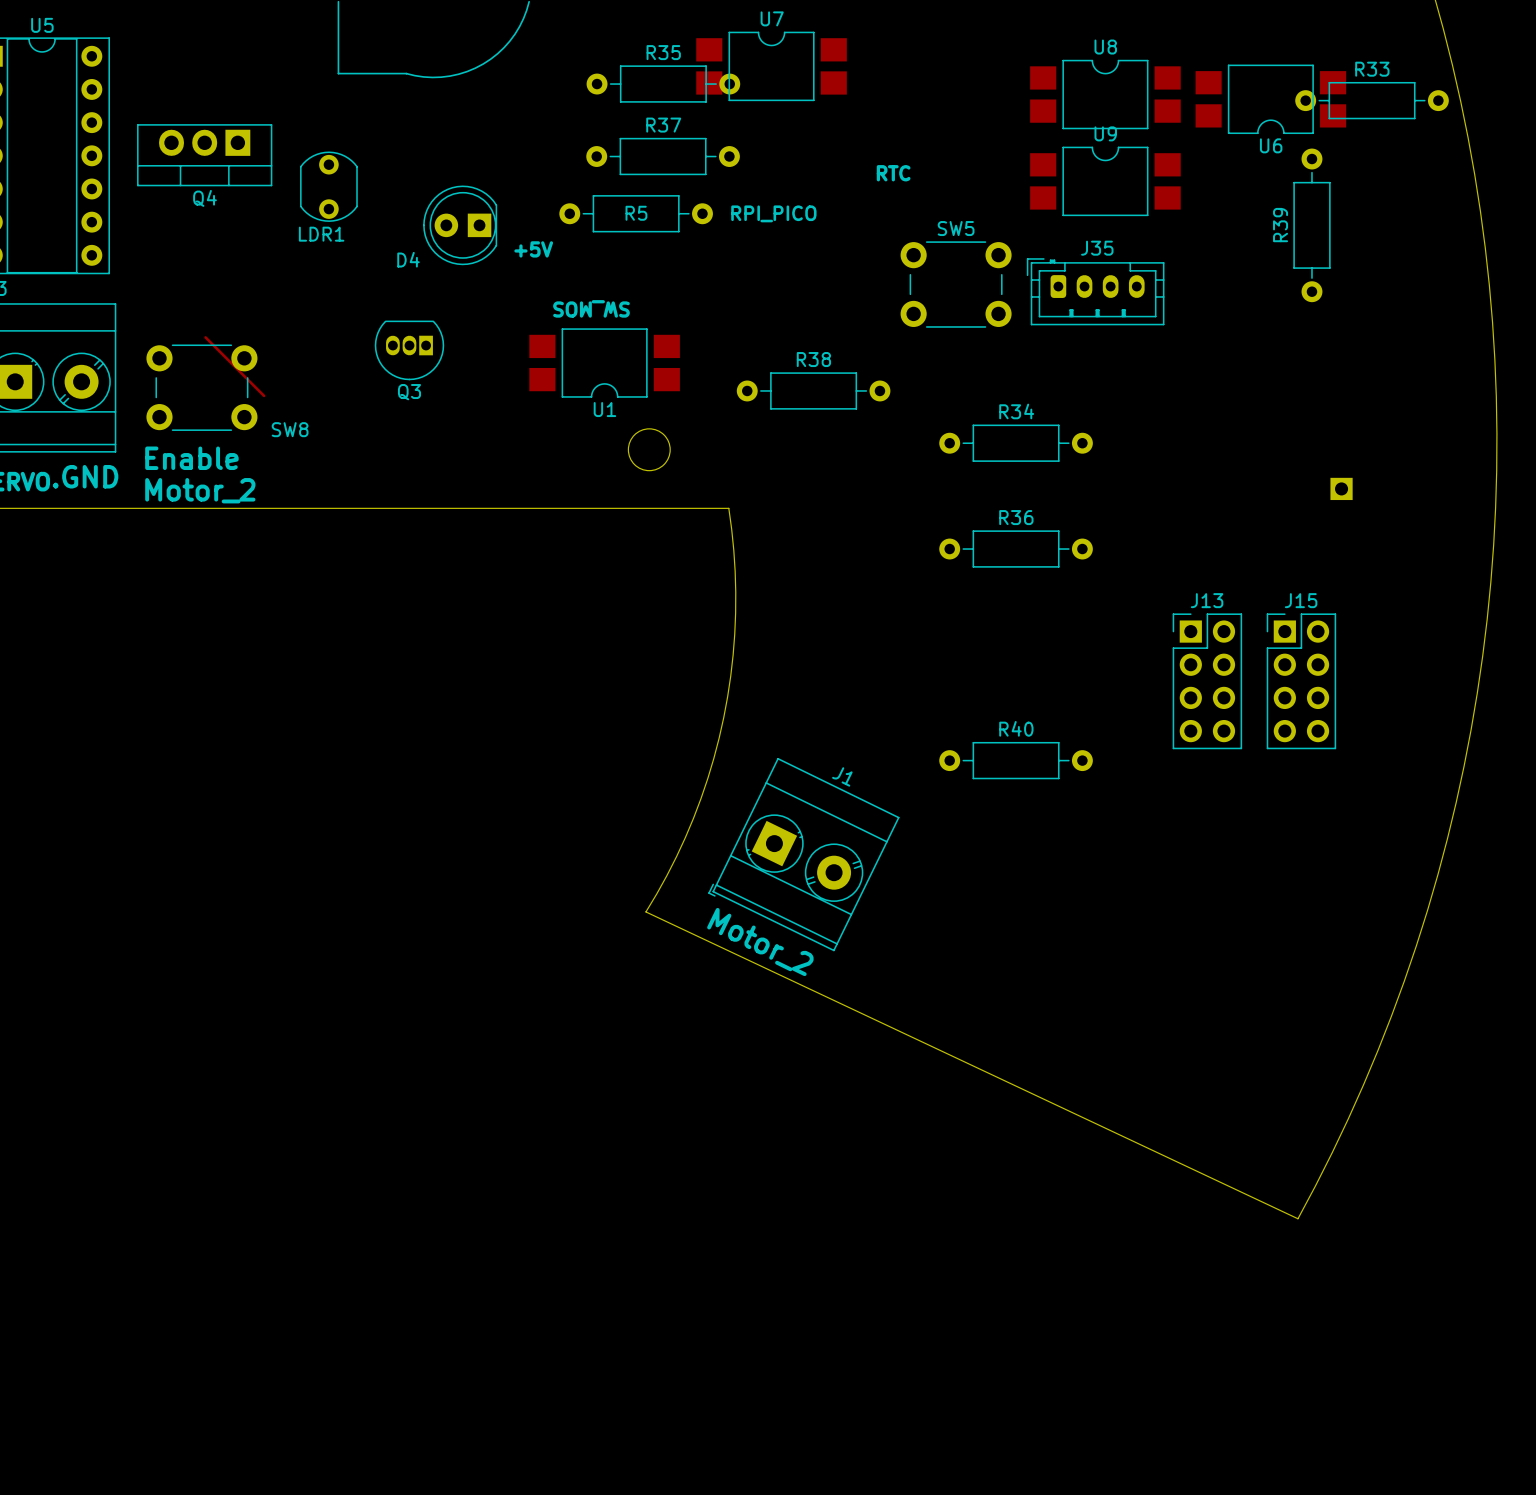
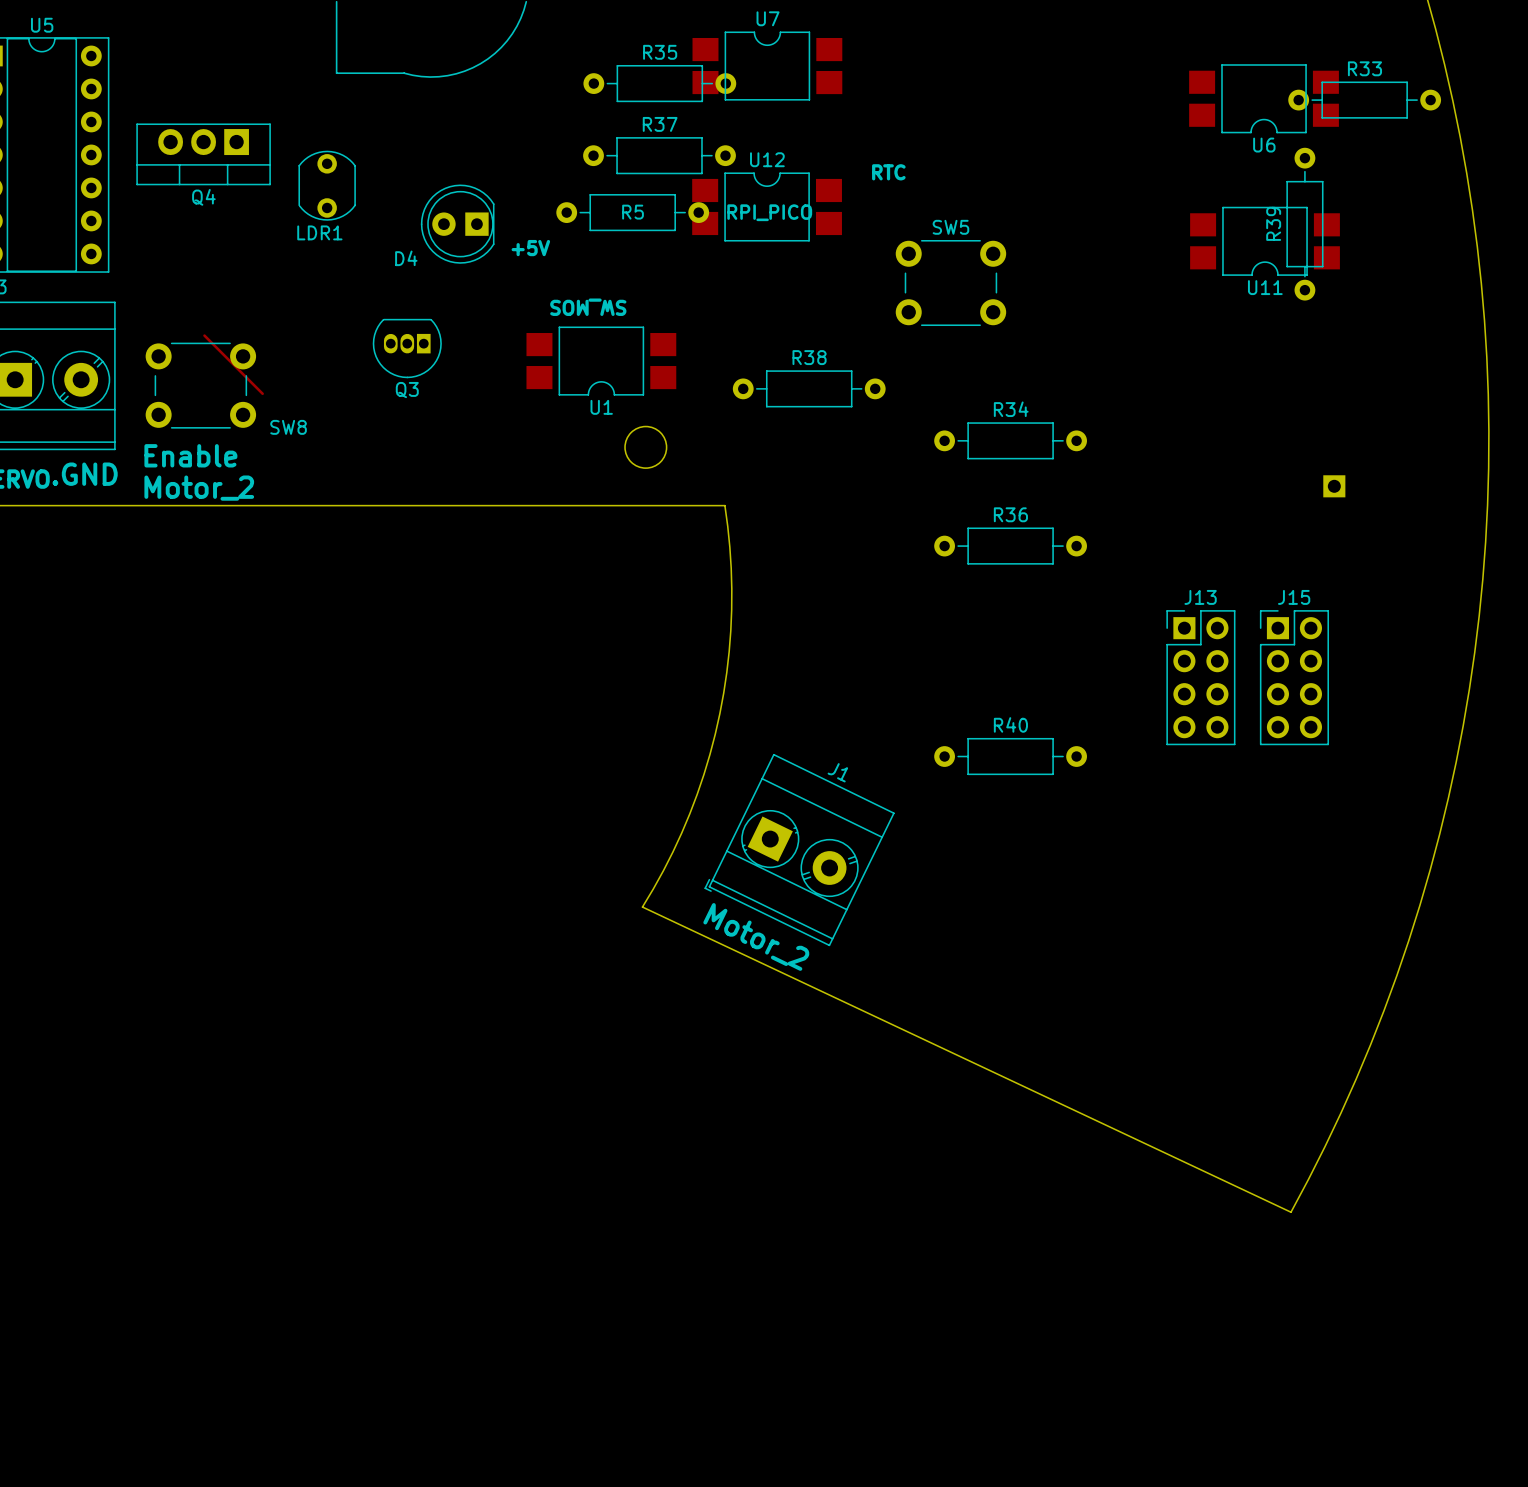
U8: (1105, 94) -> none
U9: (1105, 181) -> none
U12: none -> (767, 206)
U11: none -> (1265, 241)
J35: (1095, 291) -> none

